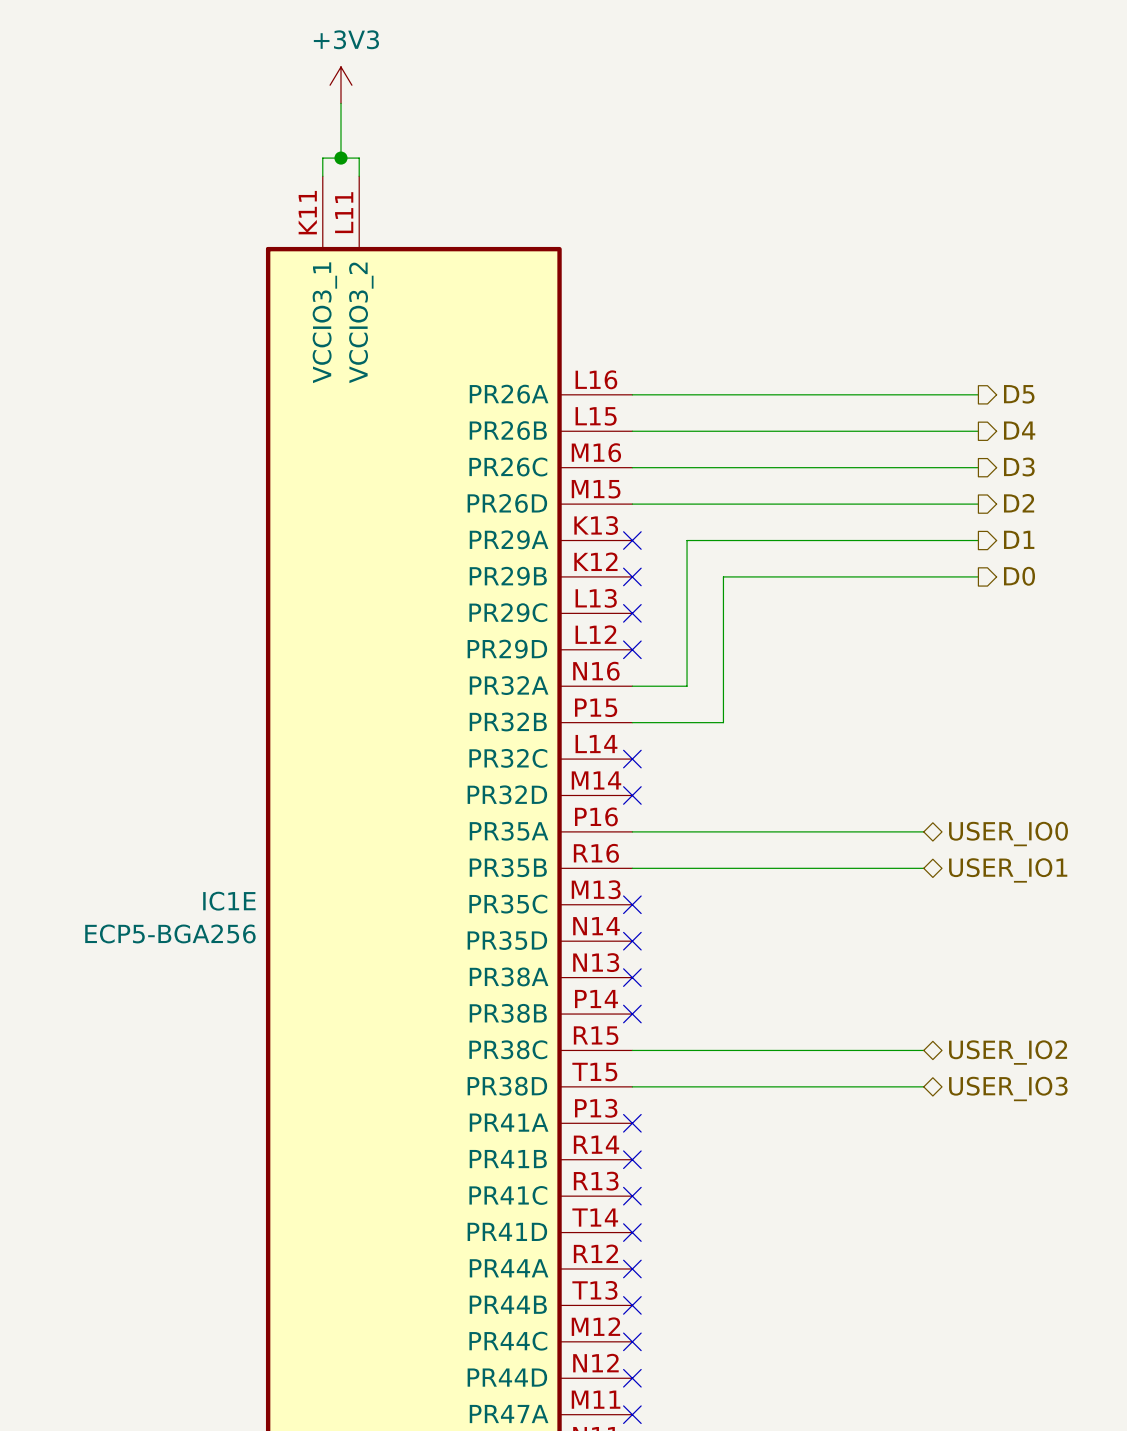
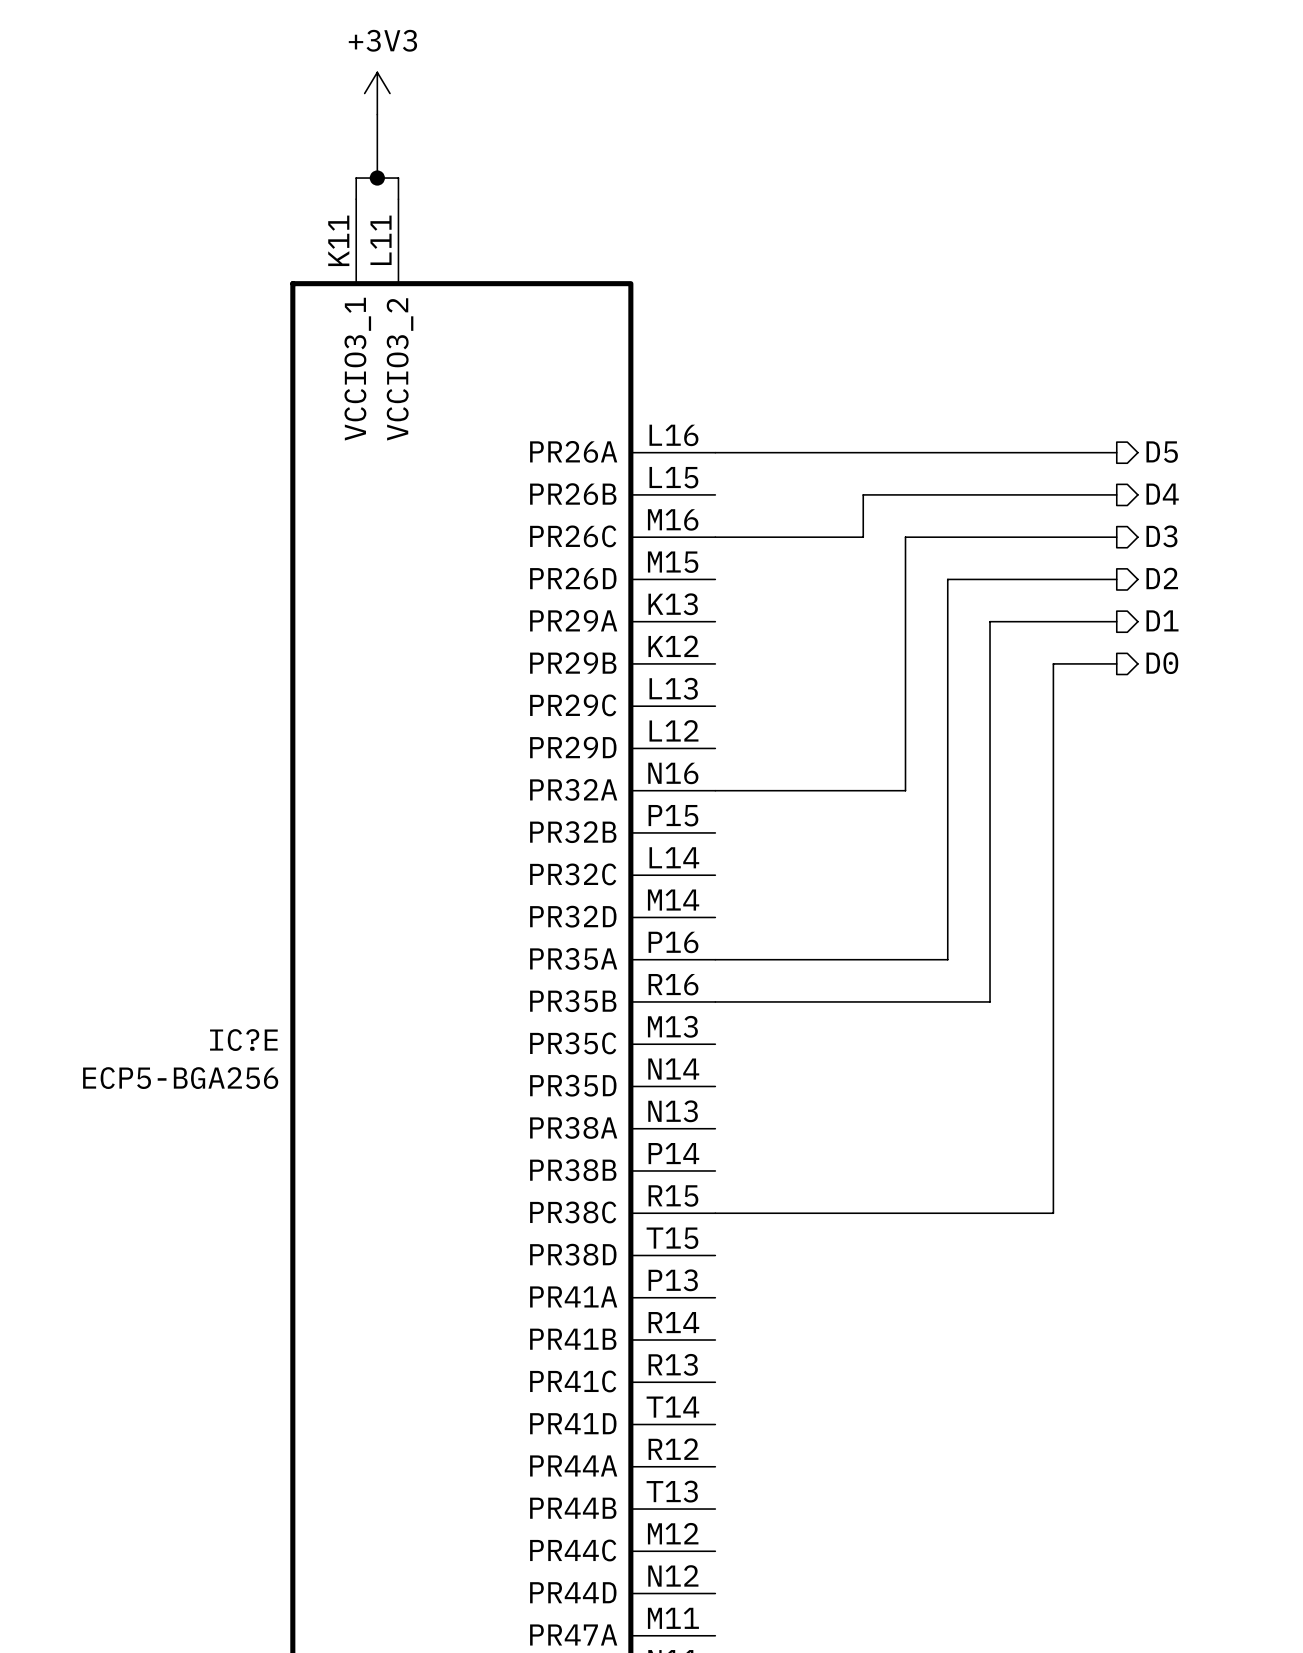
wire: (632, 431) (759, 431) -> none
wire: (759, 467) (796, 467) -> (863, 537) (863, 494)
wire: (632, 504) (832, 504) -> none
no-connect mark: (632, 540) -> none
wire: (869, 540) (687, 540) (687, 686) -> (905, 537) (905, 790) (778, 790)
no-connect mark: (632, 576) -> none
wire: (923, 576) (723, 576) (723, 722) (632, 722) -> (1053, 663) (1053, 1213)
no-connect mark: (632, 613) -> none
no-connect mark: (632, 649) -> none
no-connect mark: (632, 759) -> none
no-connect mark: (632, 795) -> none
wire: (832, 831) (923, 831) -> (947, 959) (947, 579)
hierarchical label: USER_IO0 (1008, 834) -> none
wire: (869, 868) (923, 868) -> (990, 1001) (990, 621)
hierarchical label: USER_IO1 (1008, 870) -> none
IC1E name: IC1E (229, 901) -> IC?E (243, 1040)
no-connect mark: (632, 904) -> none
no-connect mark: (632, 941) -> none
no-connect mark: (632, 977) -> none
no-connect mark: (632, 1014) -> none
hierarchical label: USER_IO2 (1008, 1052) -> none
wire: (632, 1086) (923, 1086) -> none
hierarchical label: USER_IO3 (1008, 1088) -> none
no-connect mark: (632, 1123) -> none
no-connect mark: (632, 1159) -> none
no-connect mark: (632, 1196) -> none
no-connect mark: (632, 1232) -> none
no-connect mark: (632, 1268) -> none
no-connect mark: (632, 1305) -> none
no-connect mark: (632, 1341) -> none
no-connect mark: (632, 1378) -> none
no-connect mark: (632, 1414) -> none

